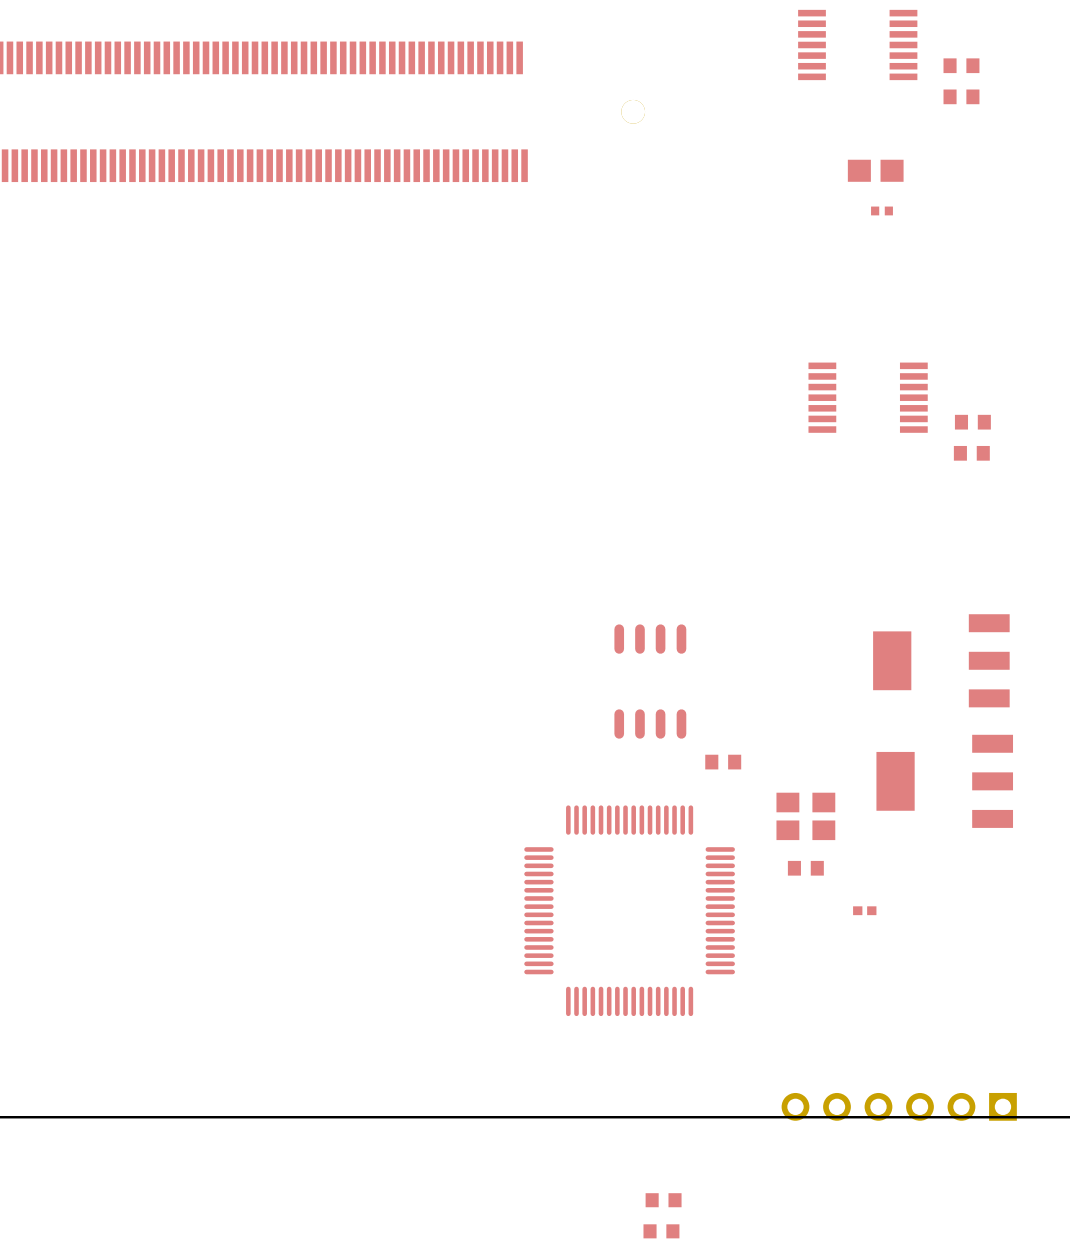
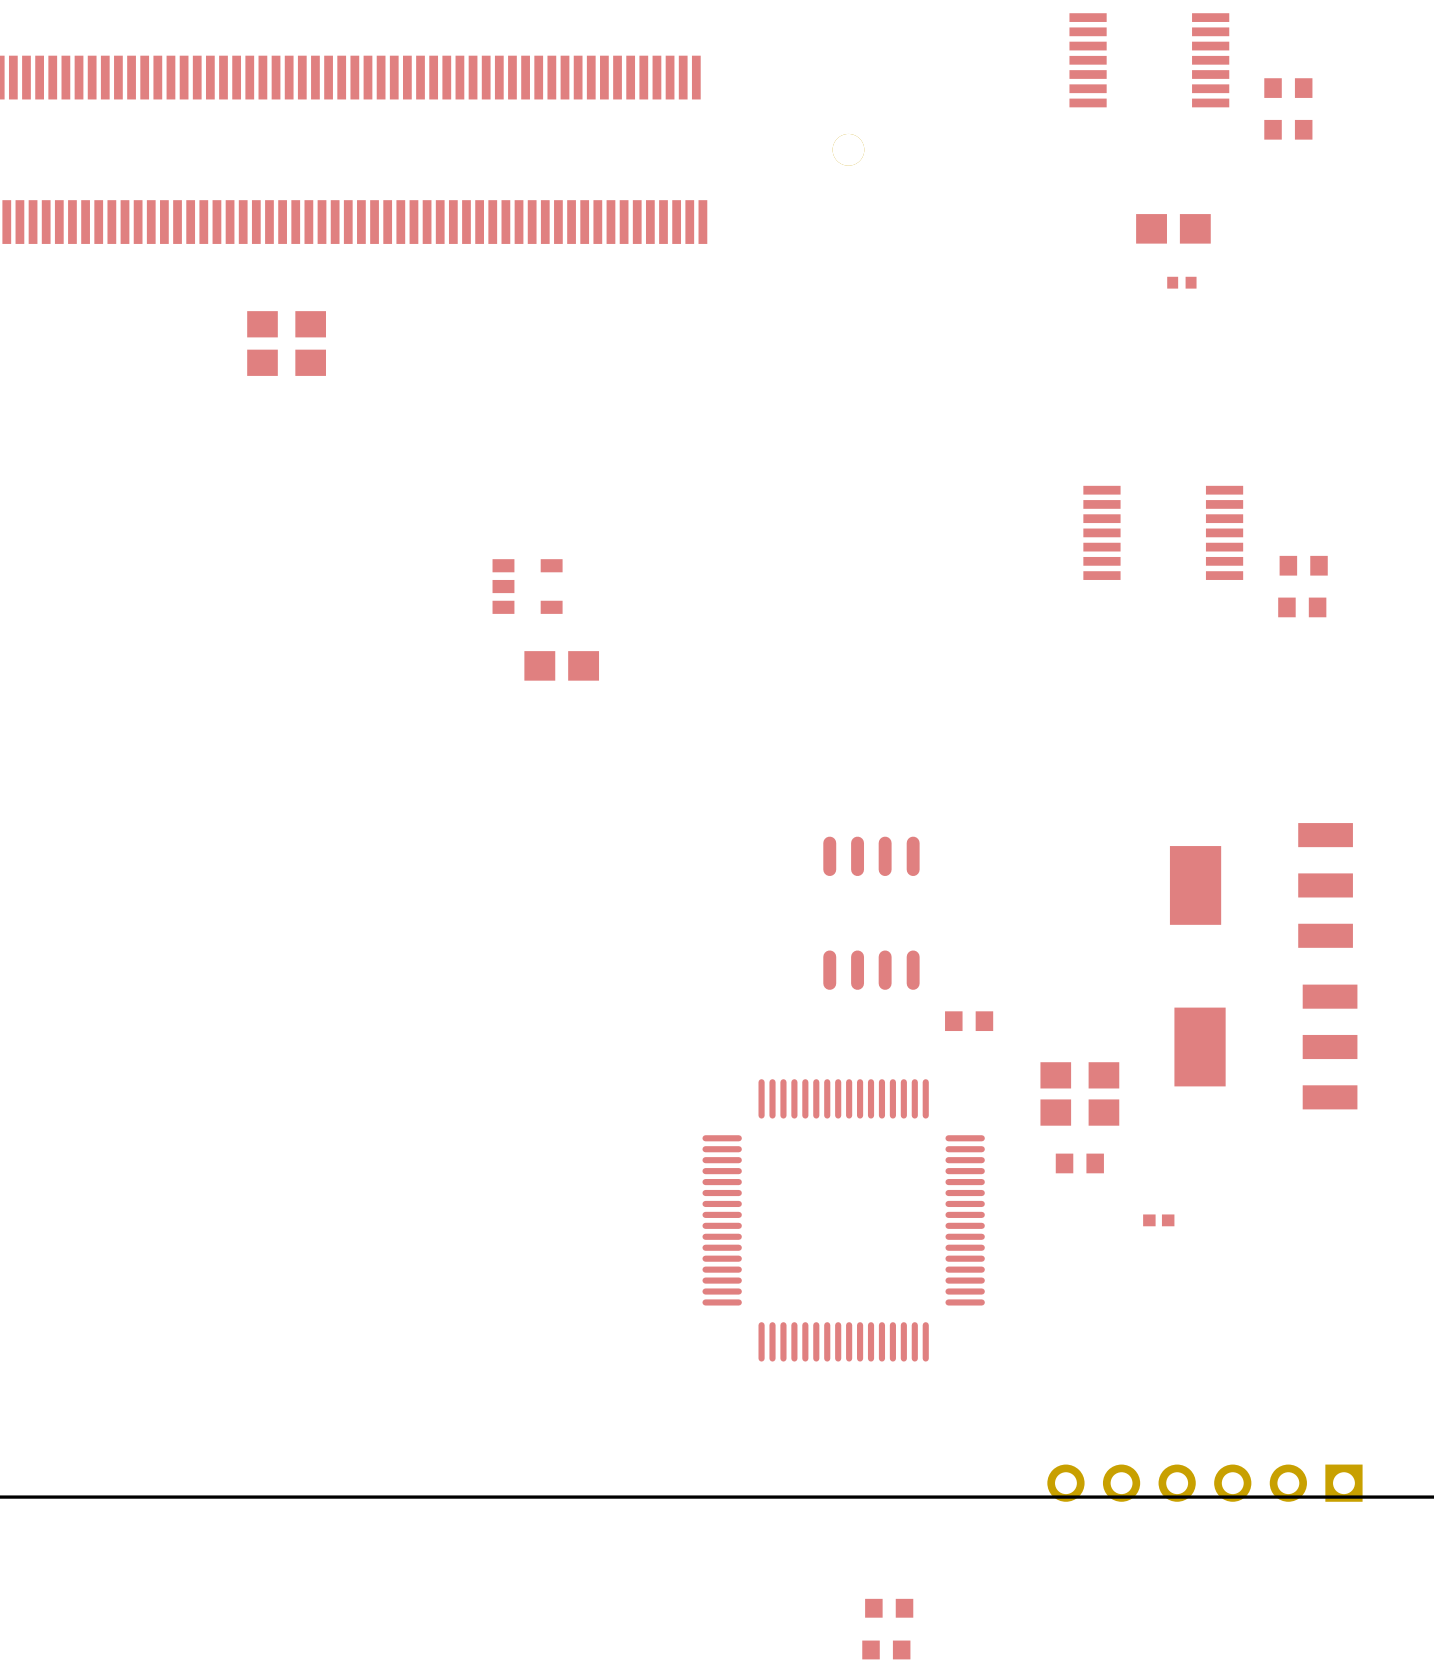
part: none -> (286, 343)
part: none -> (527, 586)
part: none -> (561, 665)

